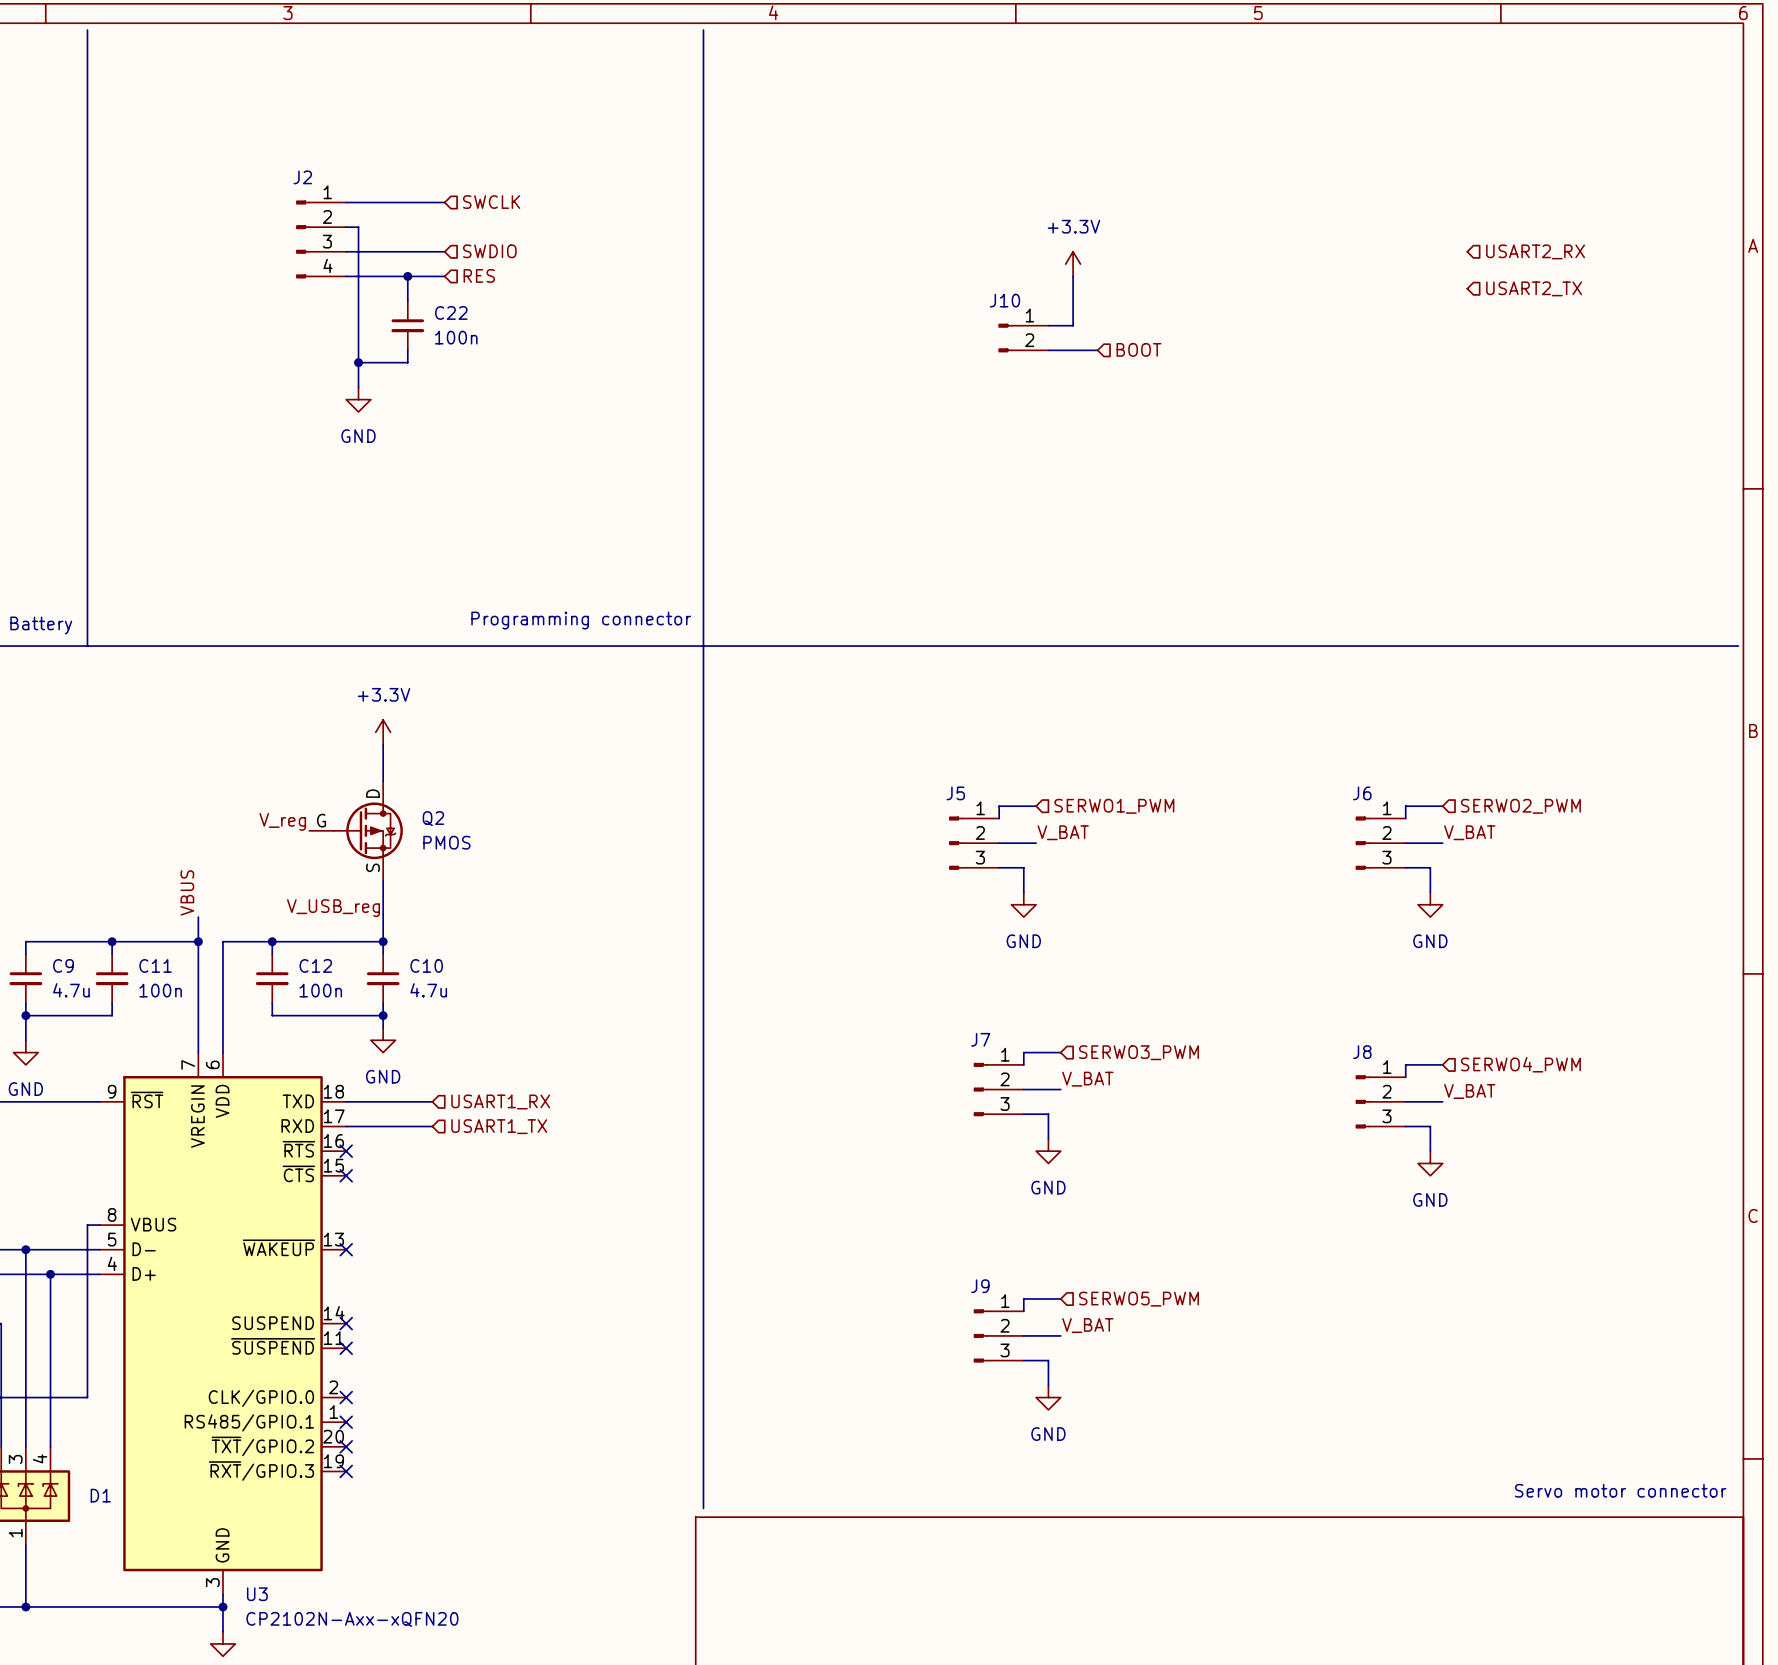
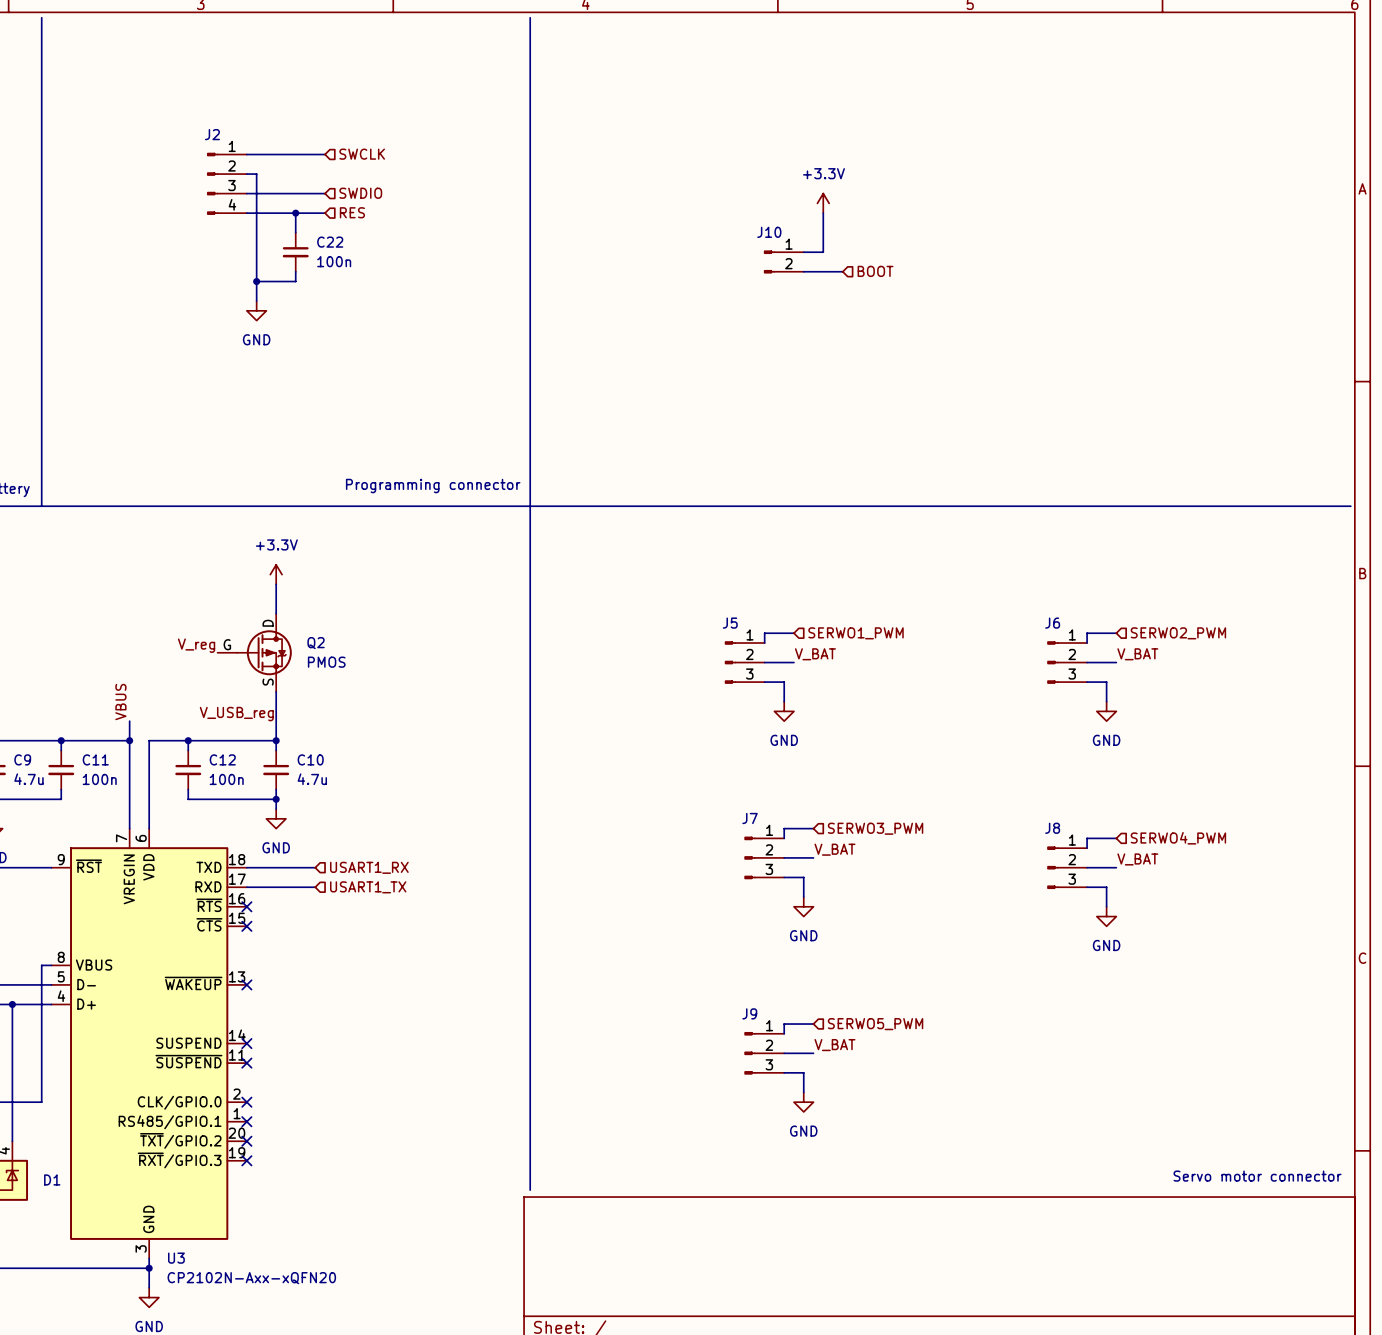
hierarchical label: USART2_RX (1535, 251) -> none
hierarchical label: USART2_TX (1534, 288) -> none

